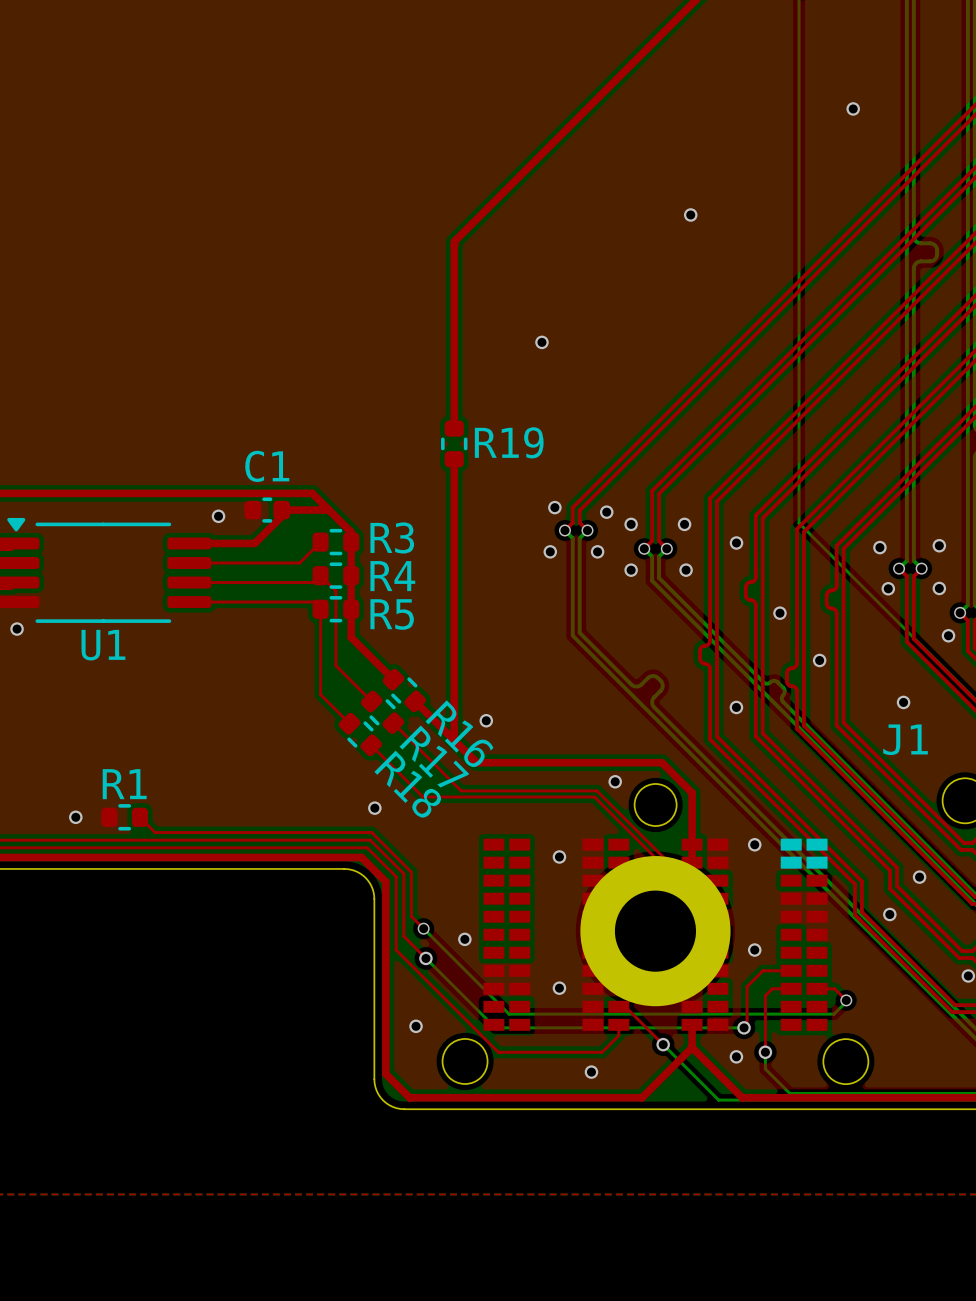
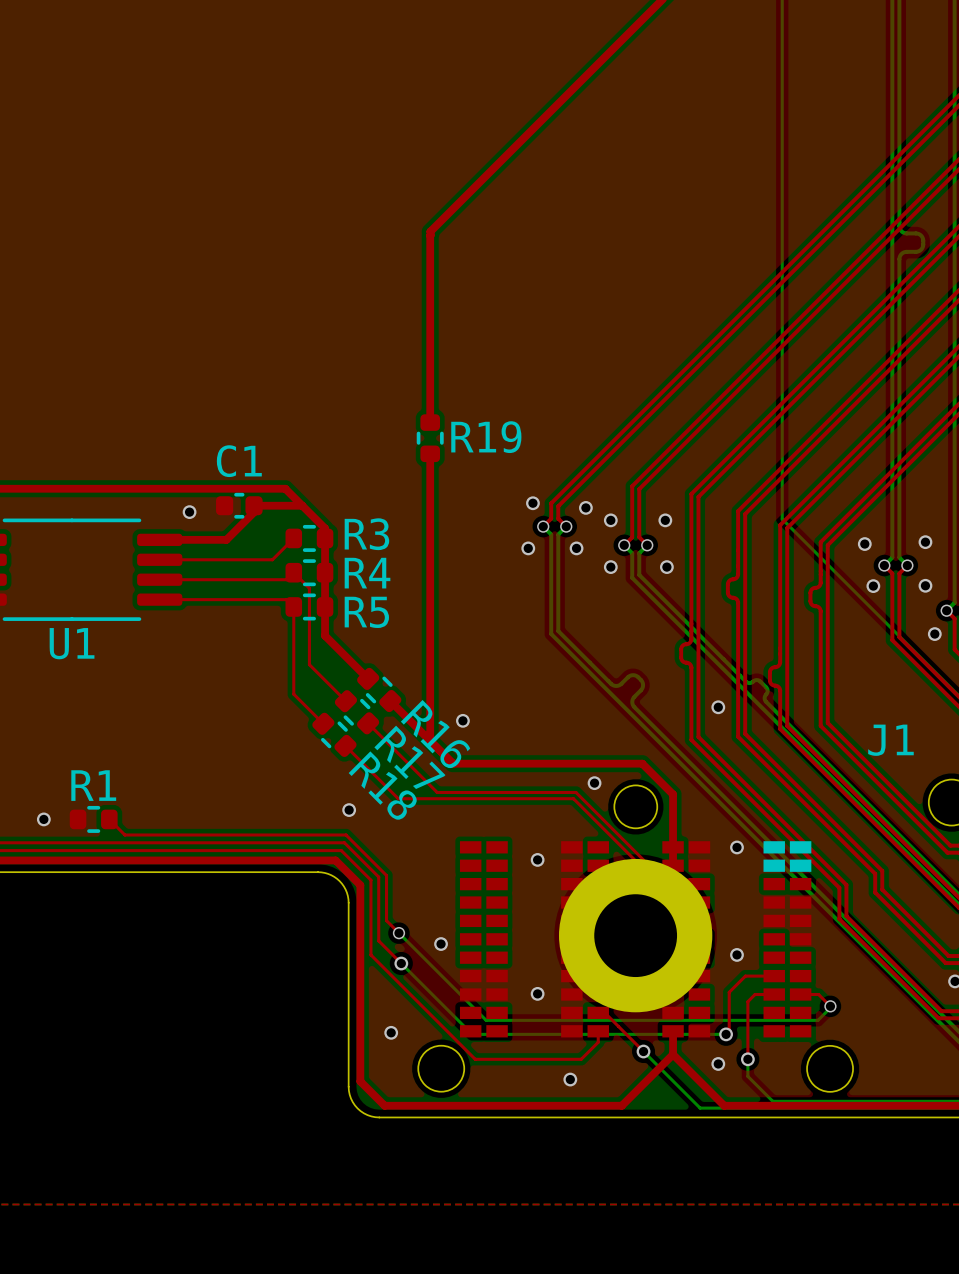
via: (853, 108) -> none
via: (690, 214) -> none
via: (541, 342) -> none
via: (736, 543) -> none
via: (779, 613) -> none
via: (819, 660) -> none
via: (903, 702) -> none
via: (919, 877) -> none
via: (889, 914) -> none

